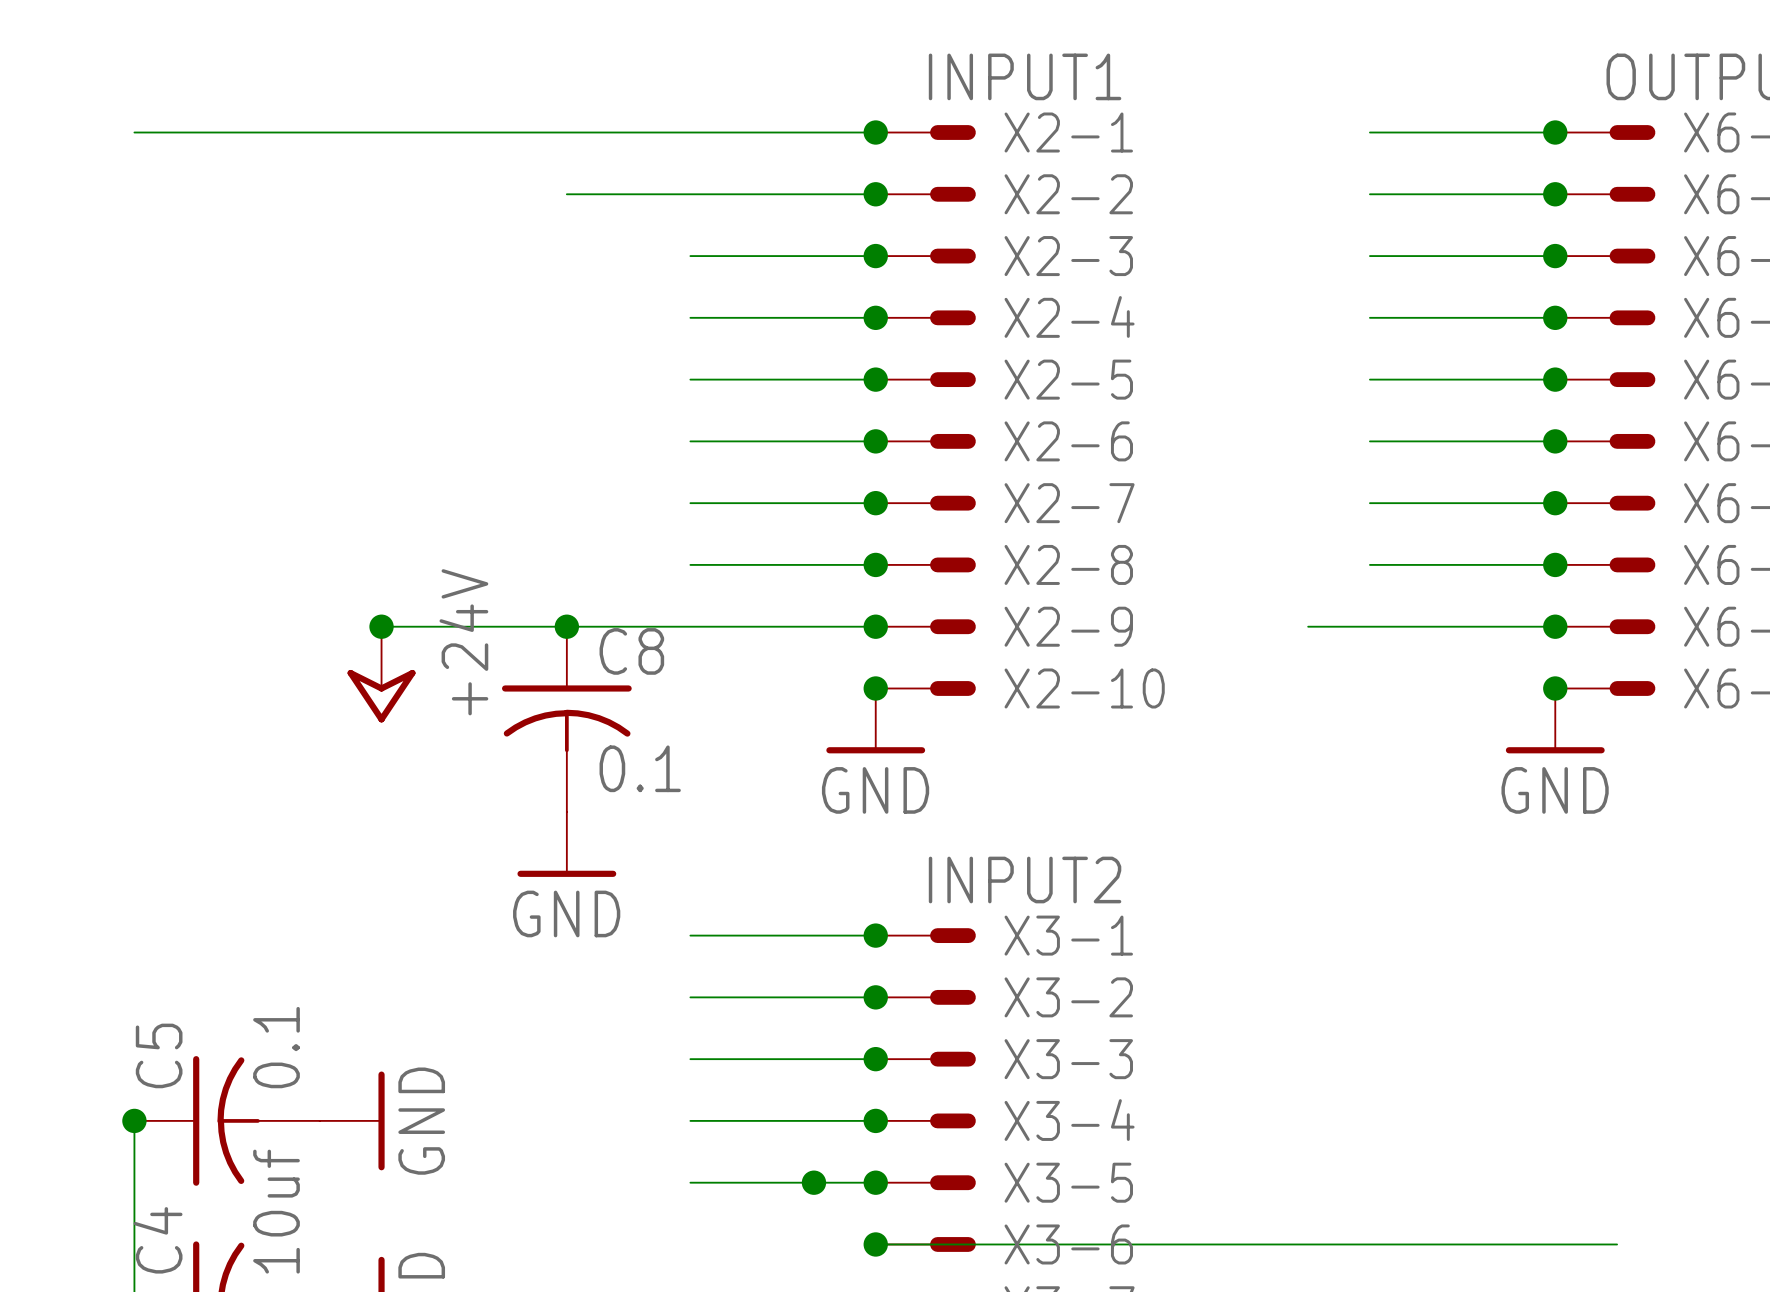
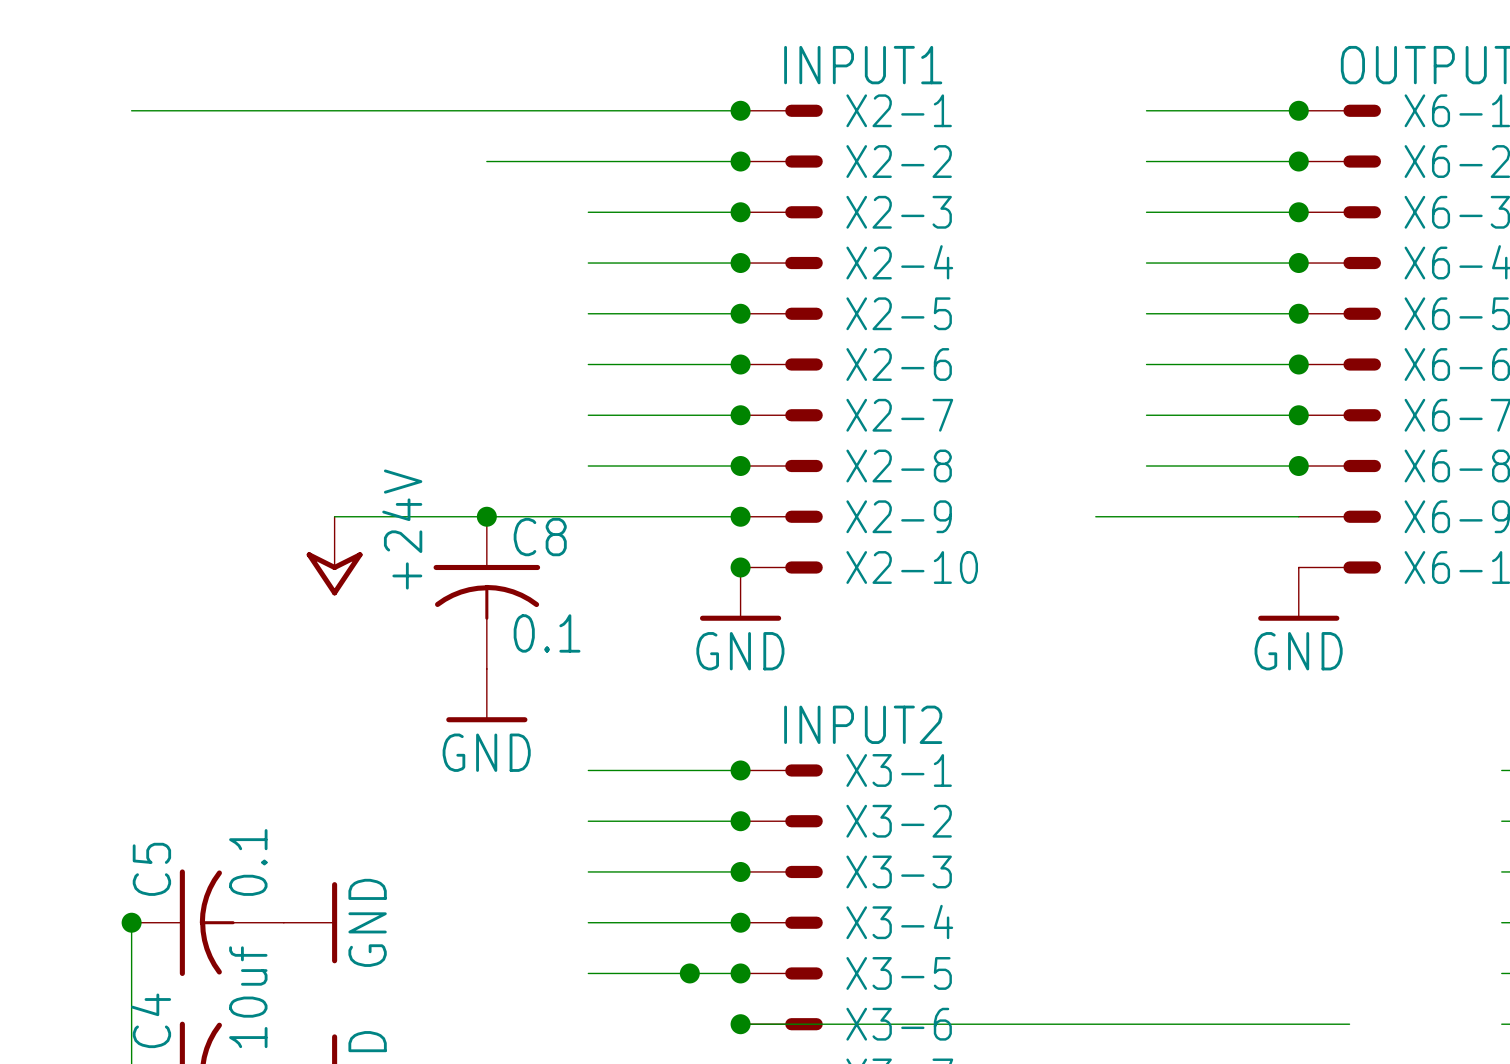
junction: (381, 626) -> none
junction: (1555, 626) -> none
junction: (1555, 688) -> none

